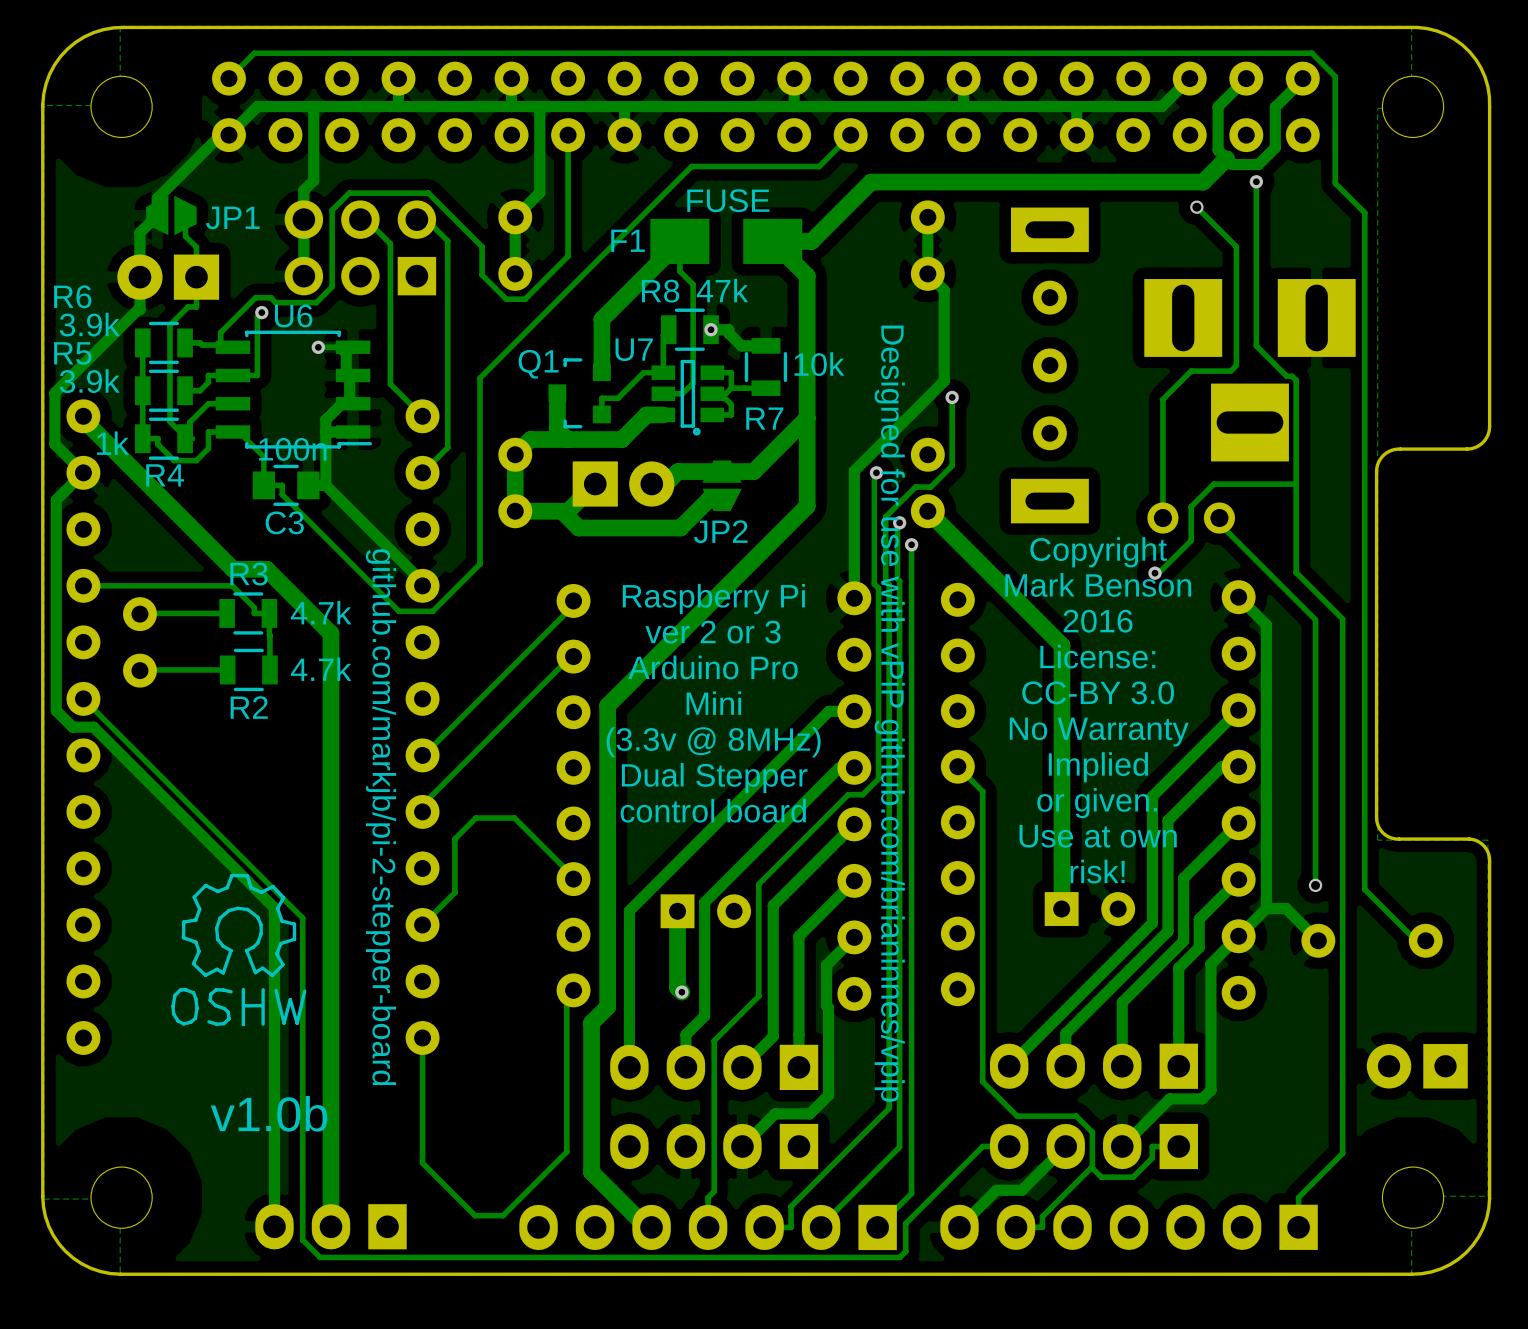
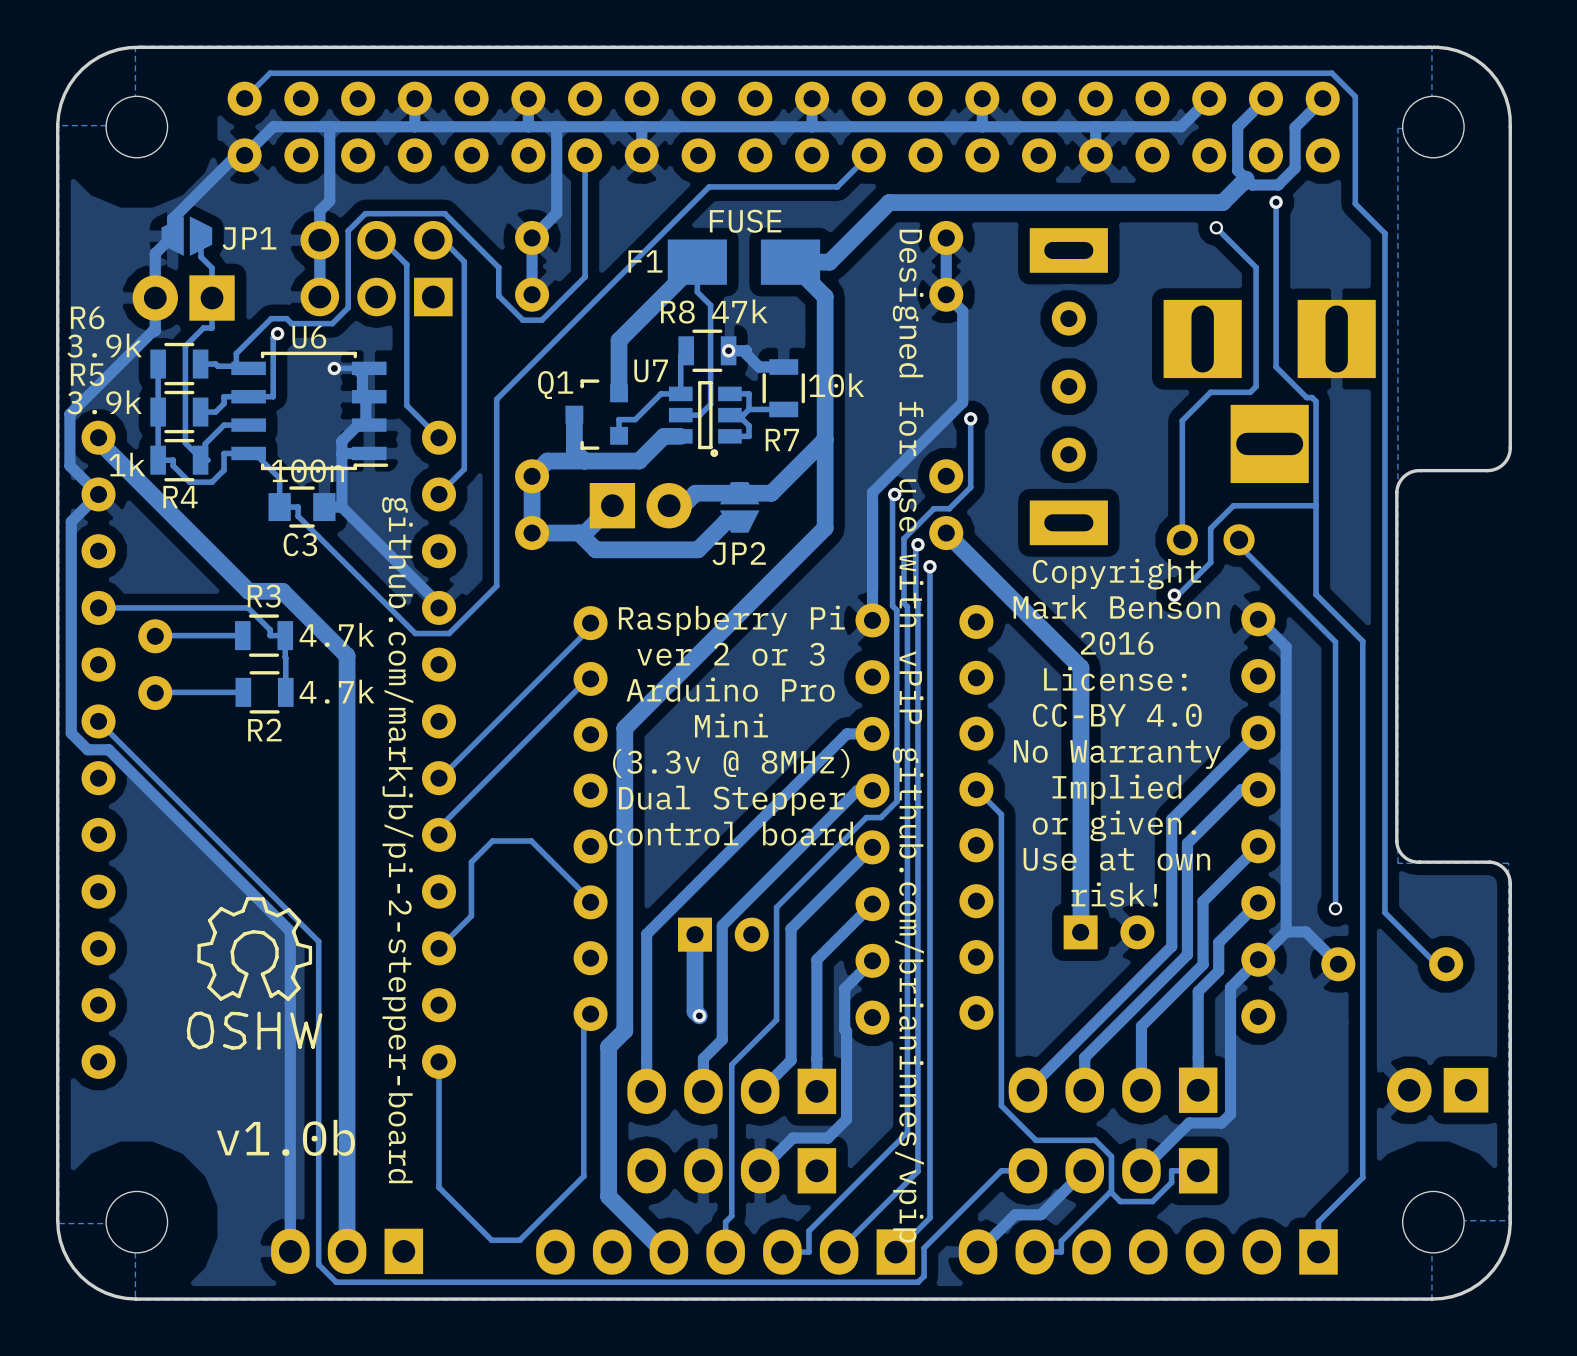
text: CC-BY 3.0 (1098, 692) -> CC-BY 4.0 (1117, 715)

